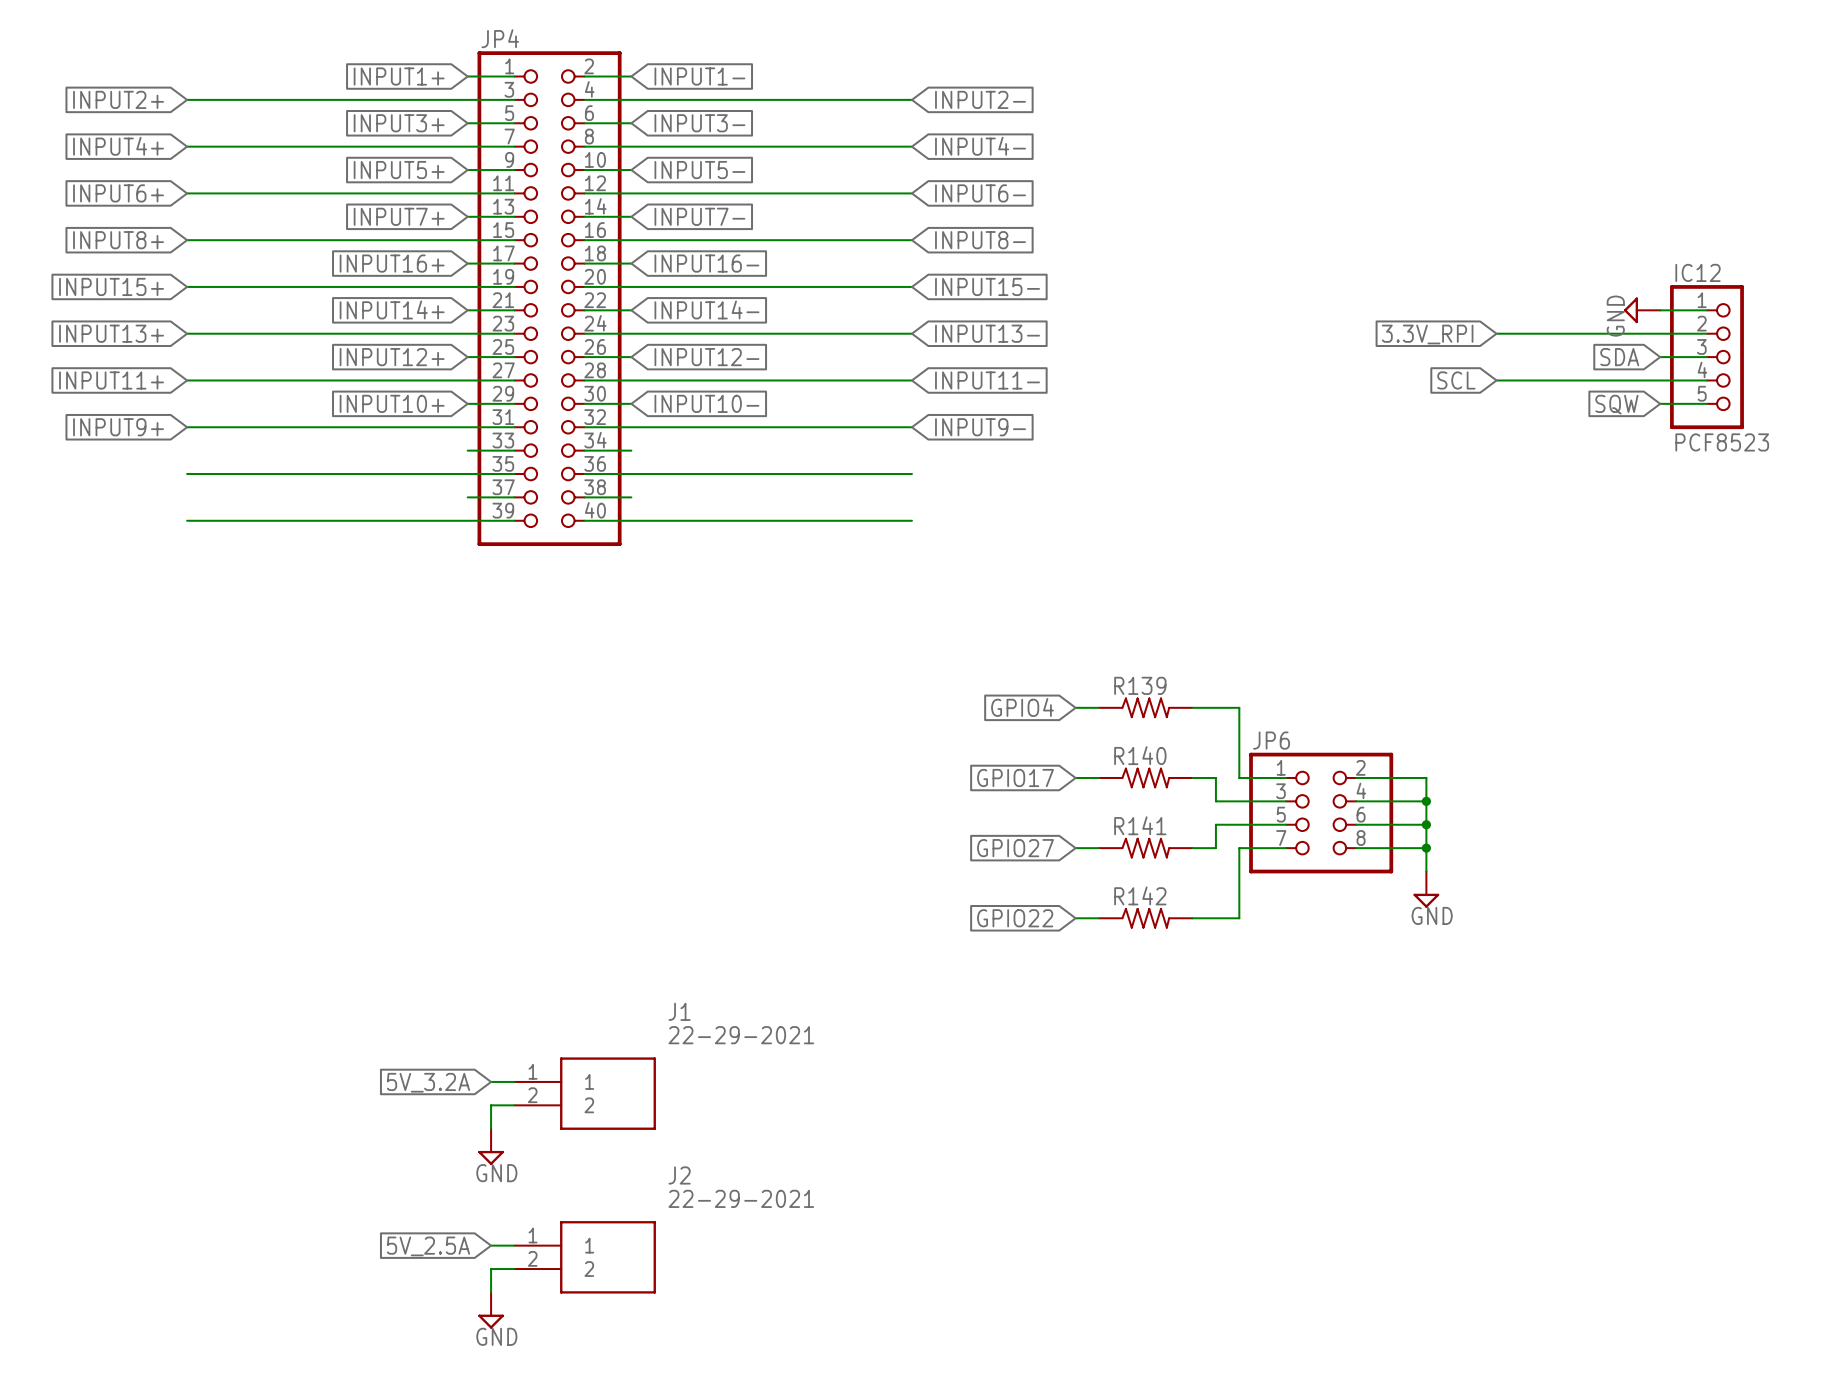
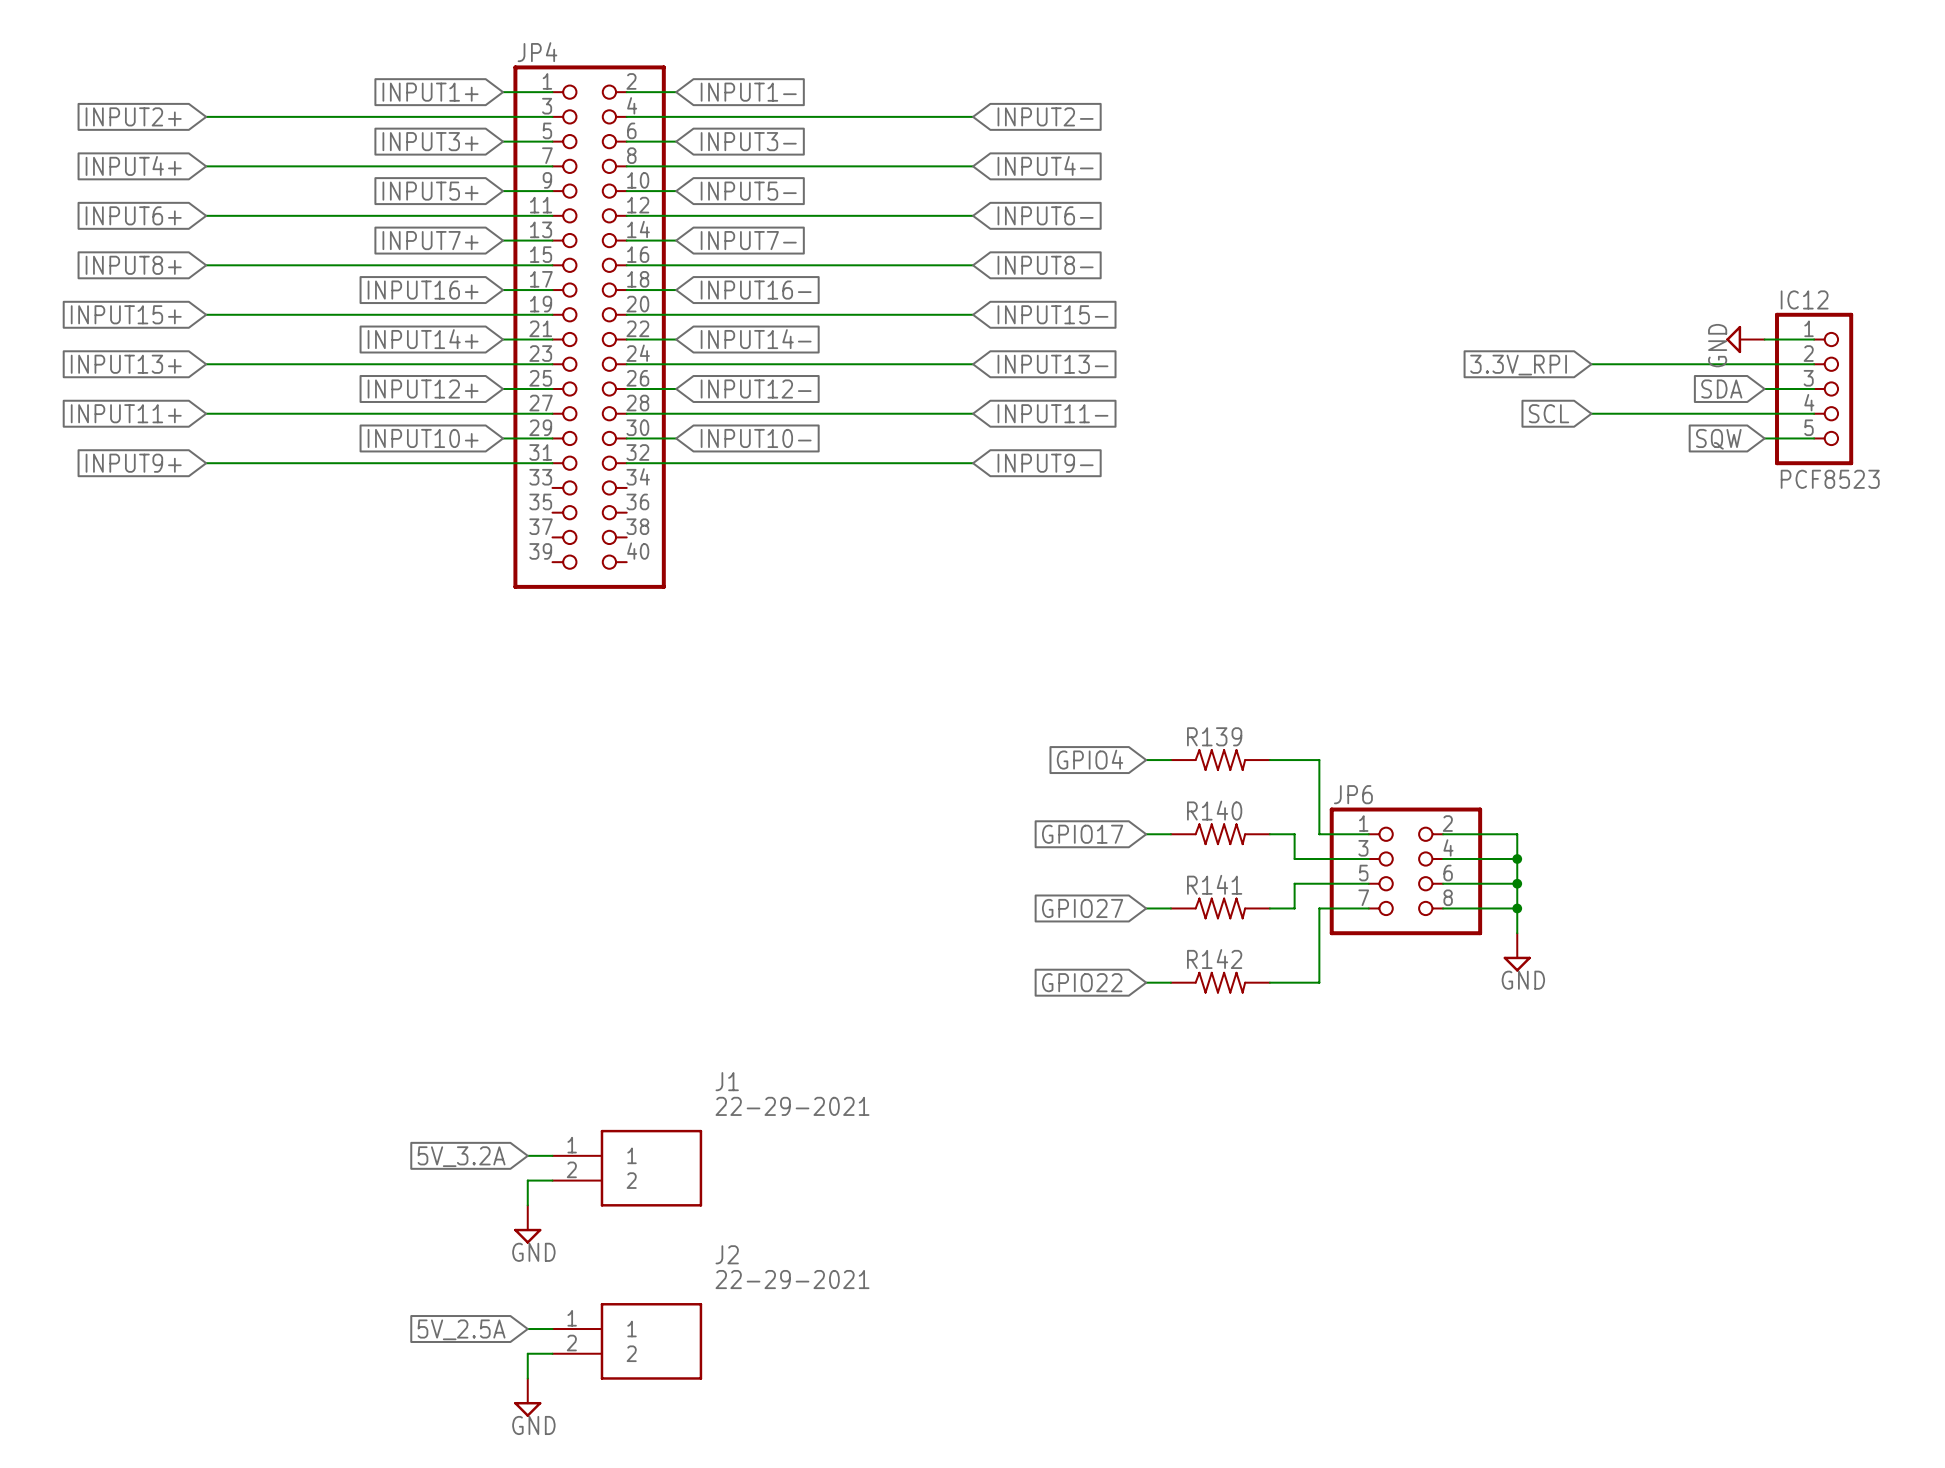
wire: (467, 450) (514, 450) -> none
wire: (584, 450) (631, 450) -> none
wire: (187, 474) (514, 474) -> none
wire: (584, 474) (911, 474) -> none
wire: (467, 497) (514, 497) -> none
wire: (584, 497) (631, 497) -> none
wire: (187, 520) (514, 520) -> none
wire: (584, 520) (911, 520) -> none

